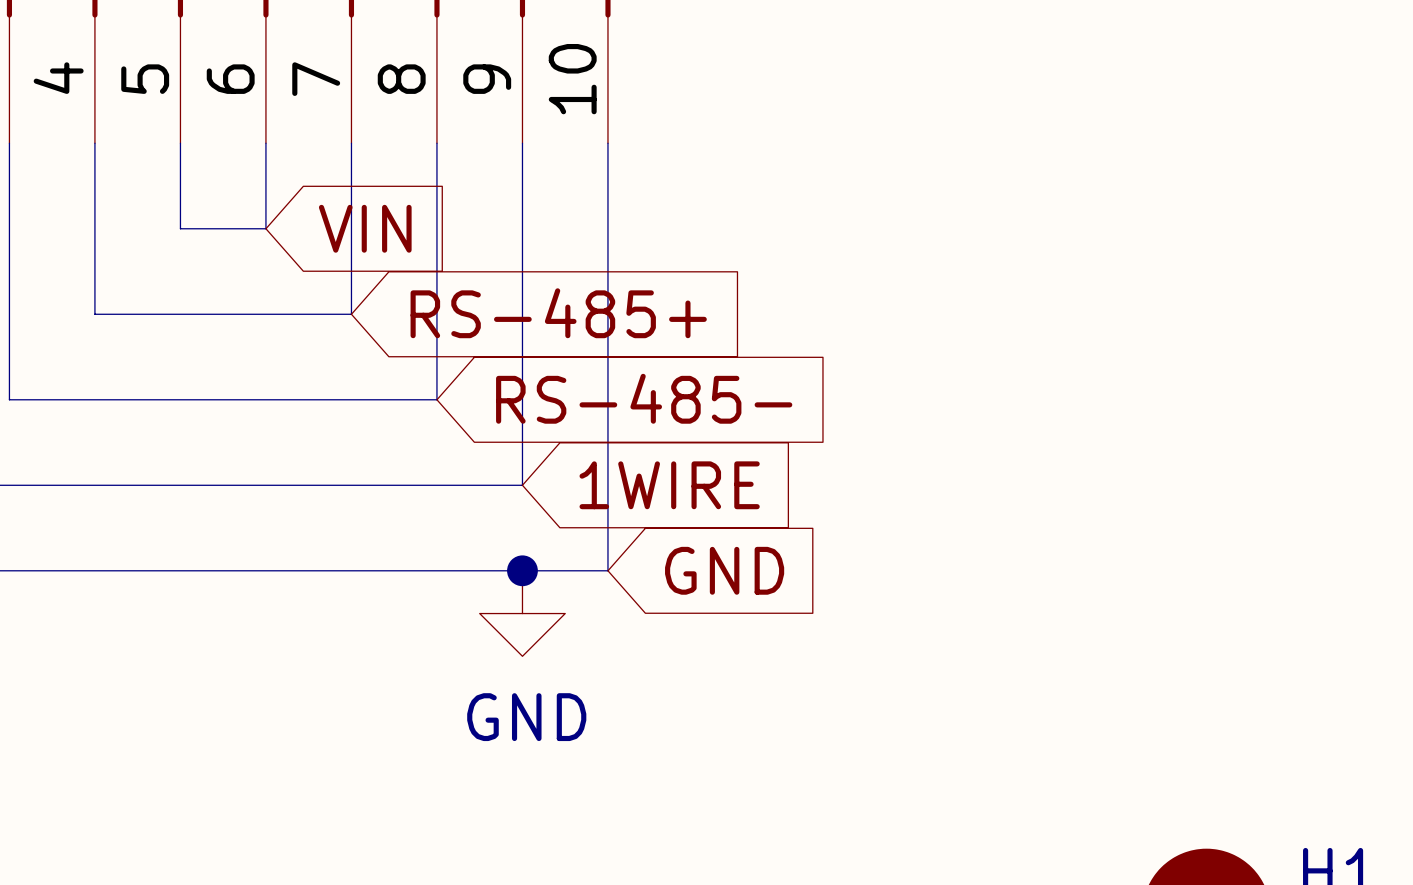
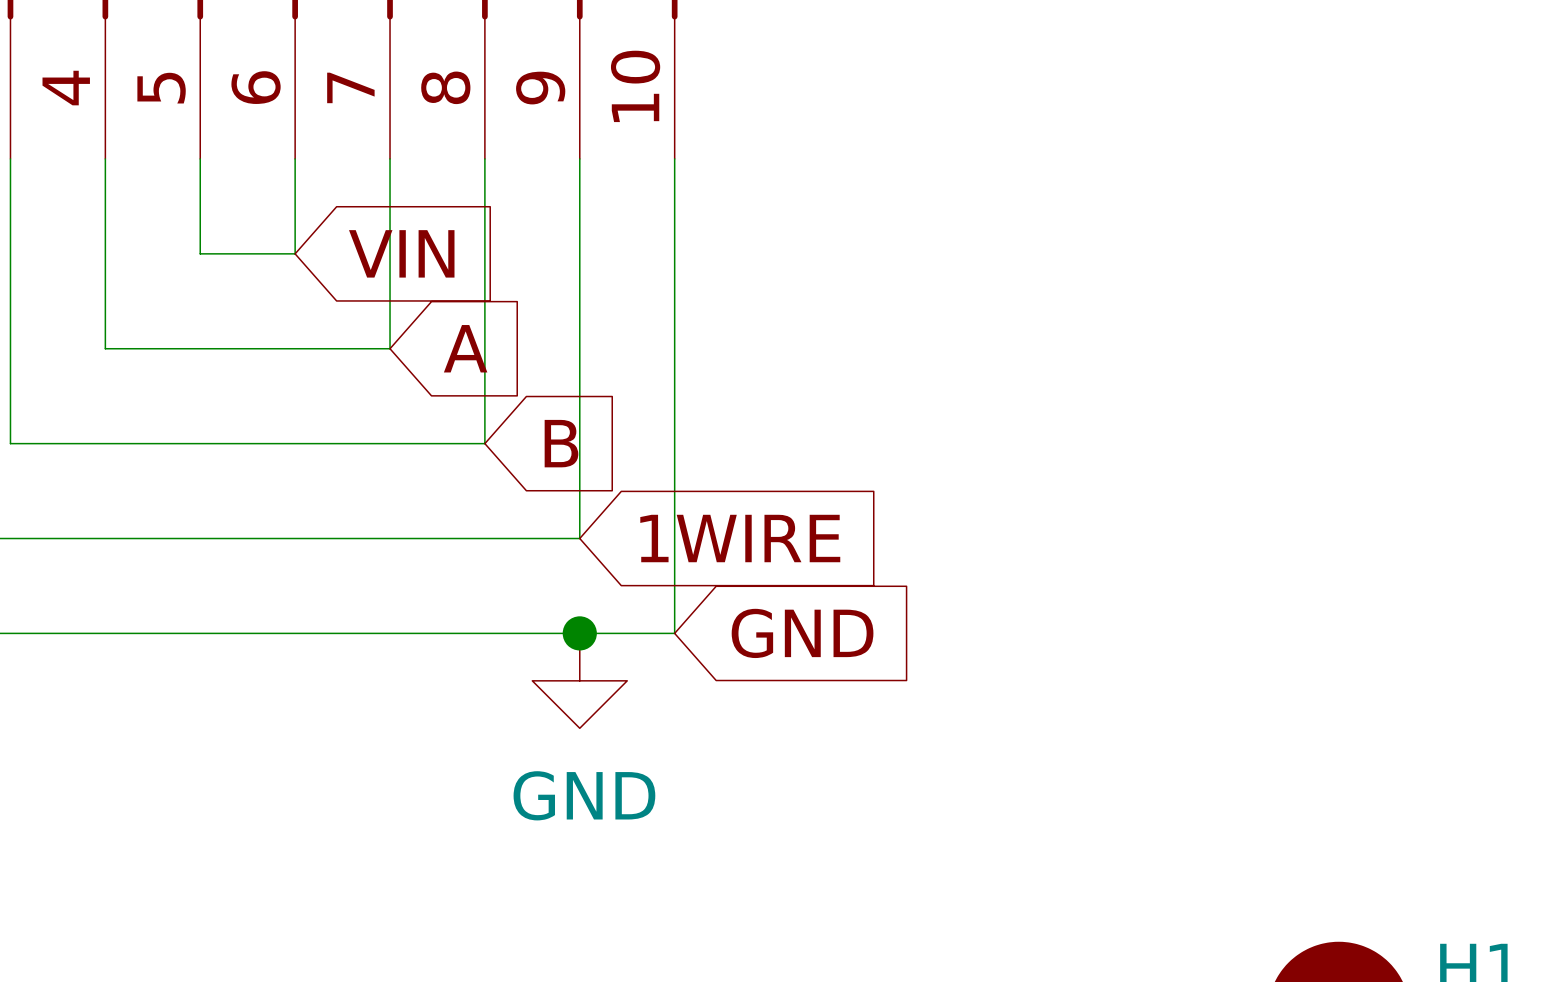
global label: RS-485+ (558, 313) -> A (465, 348)
global label: RS-485- (644, 398) -> B (561, 443)

